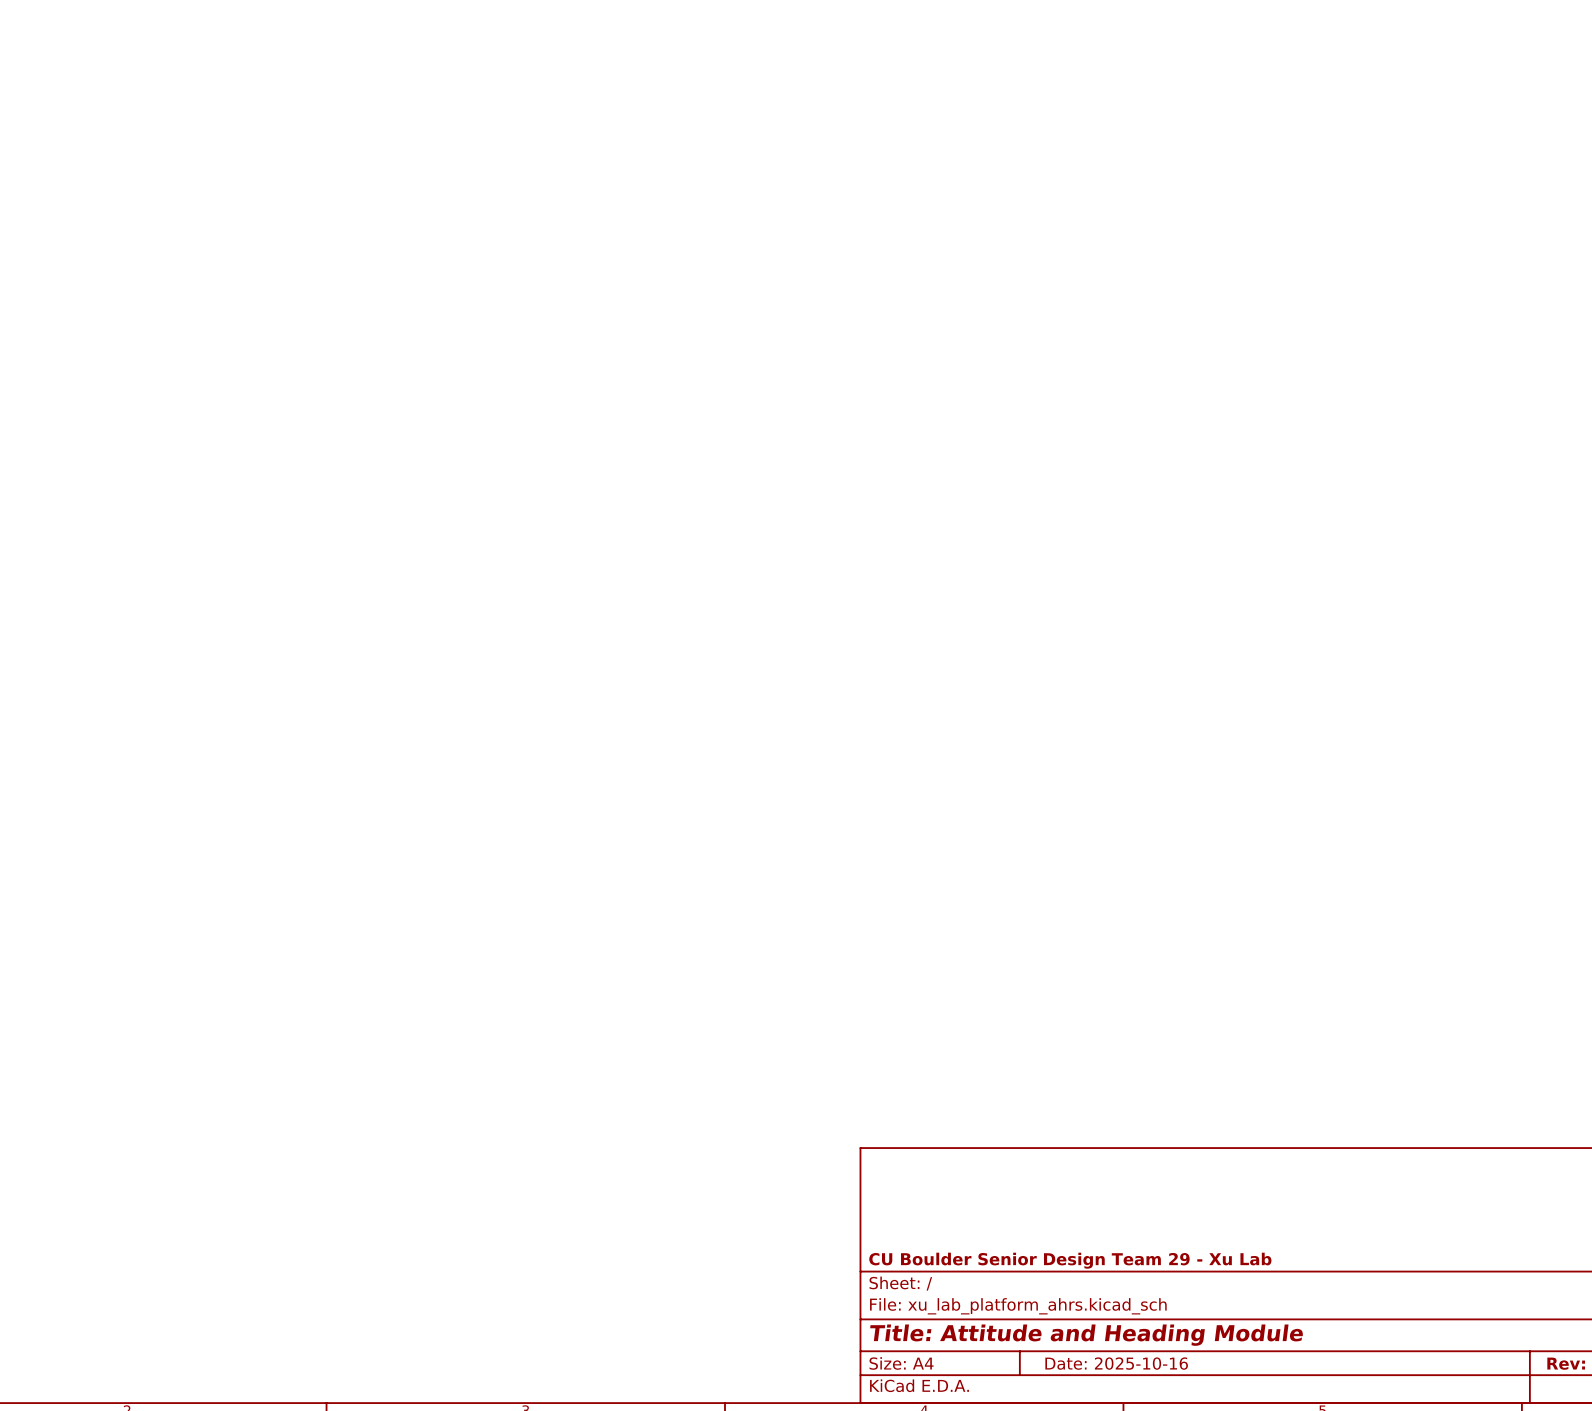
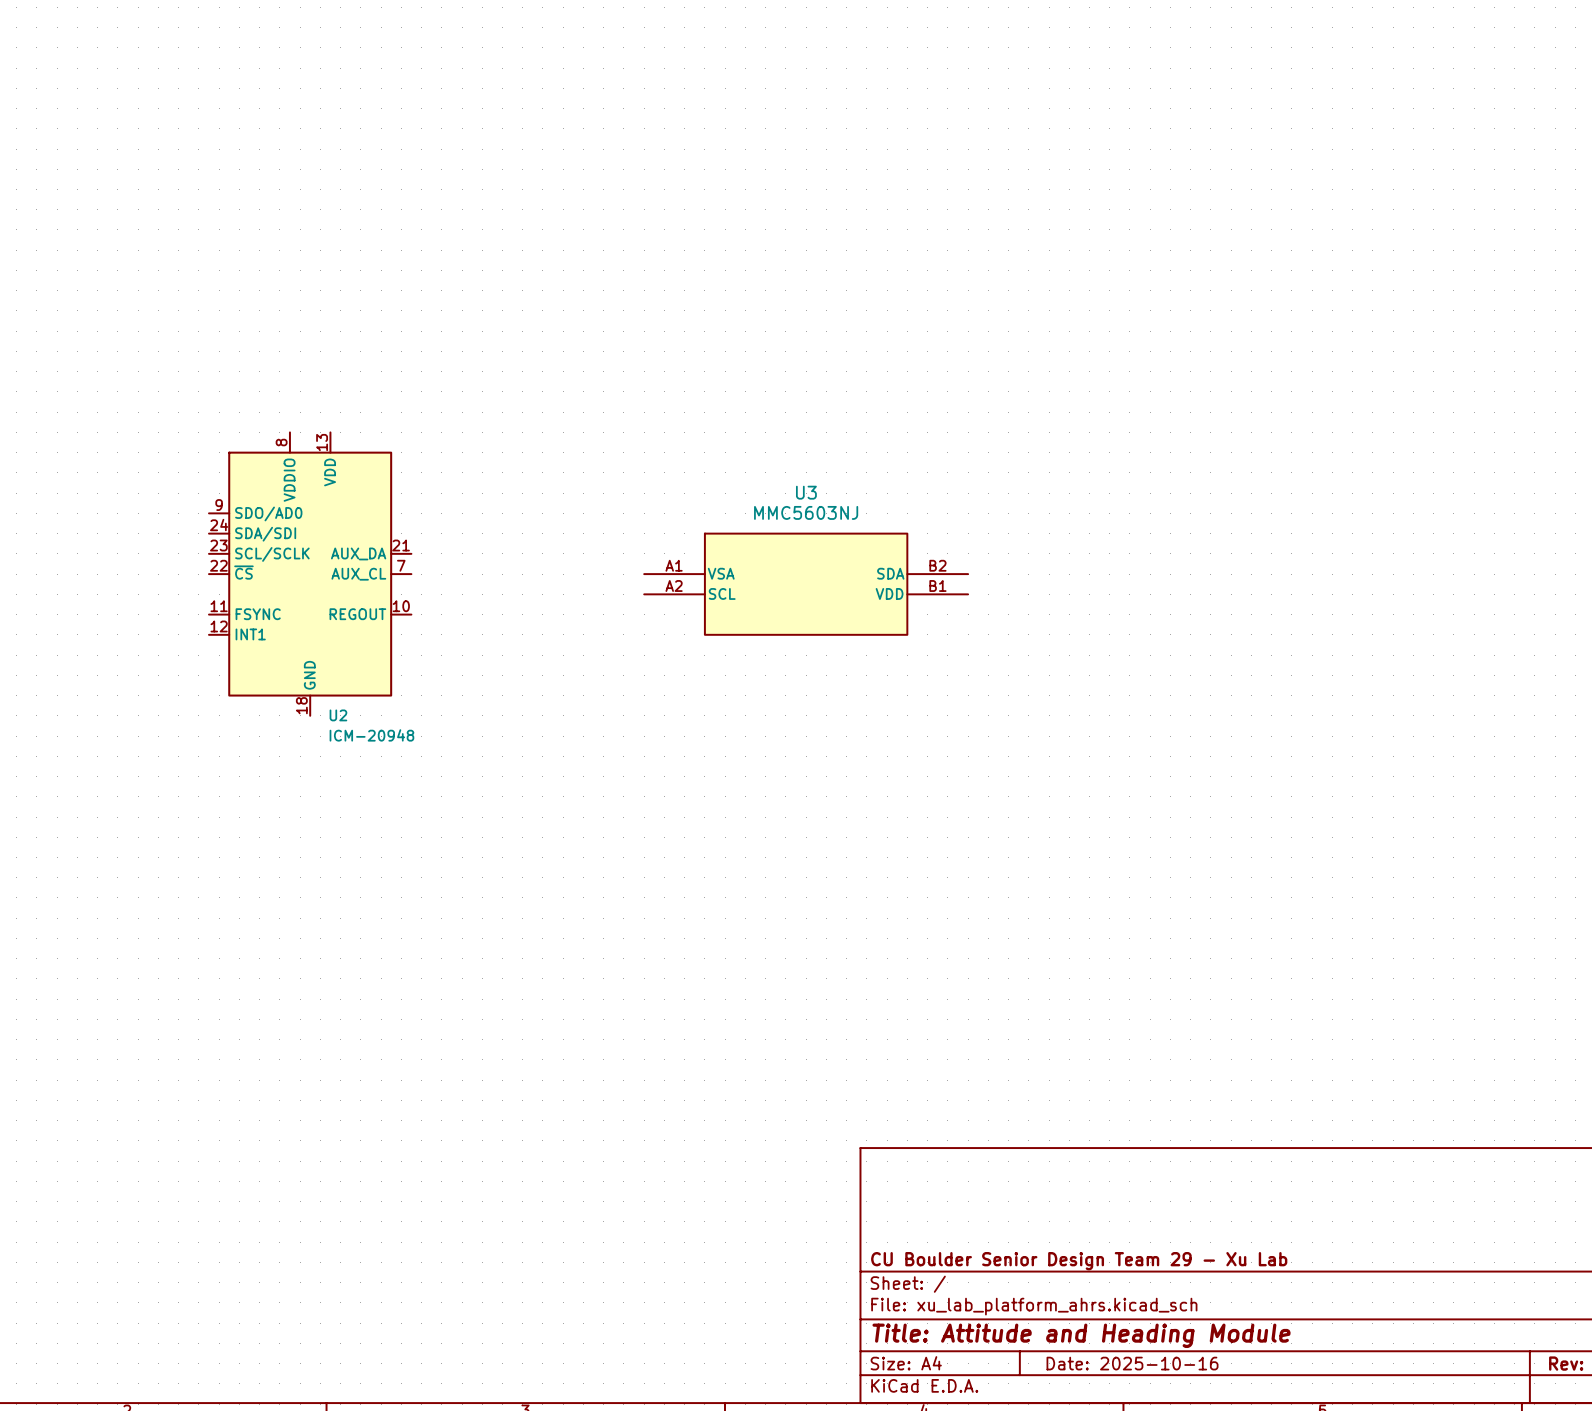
U2: none -> ICM-20948 (310, 574)
U3: none -> MMC5603NJ (806, 584)

